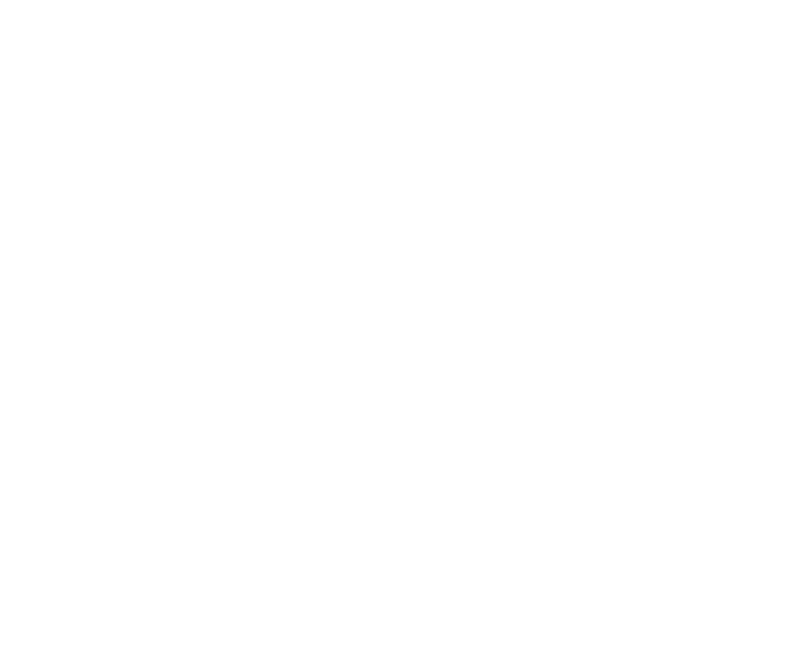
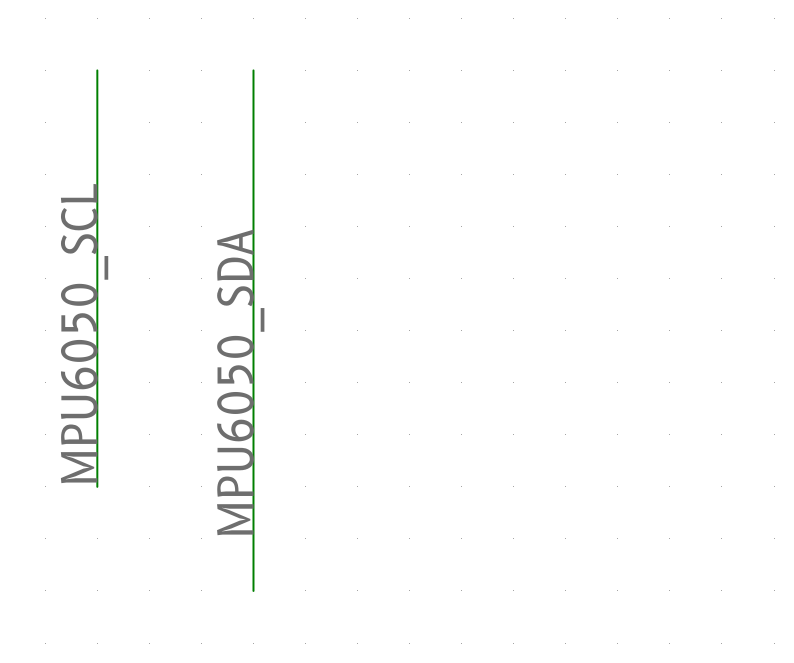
wire: none -> (97, 70) (97, 486)
wire: none -> (253, 70) (253, 590)
label: none -> MPU6050_SCL (84, 333)
label: none -> MPU6050_SDA (240, 382)

